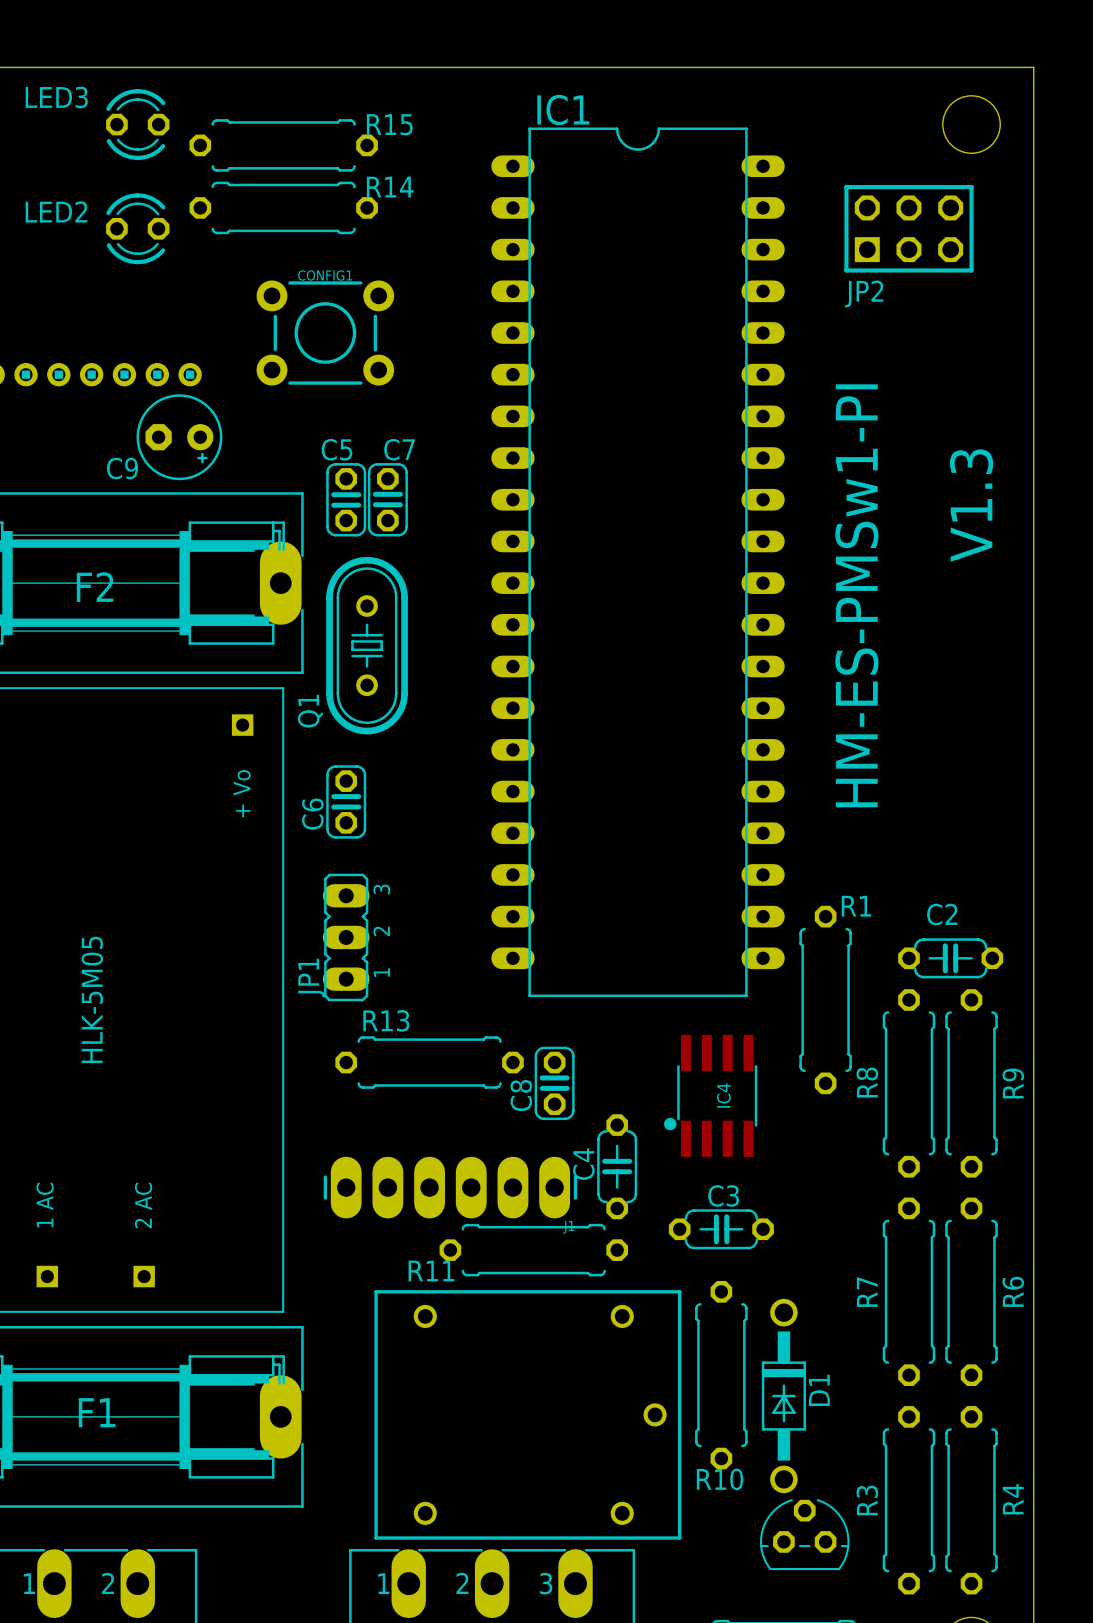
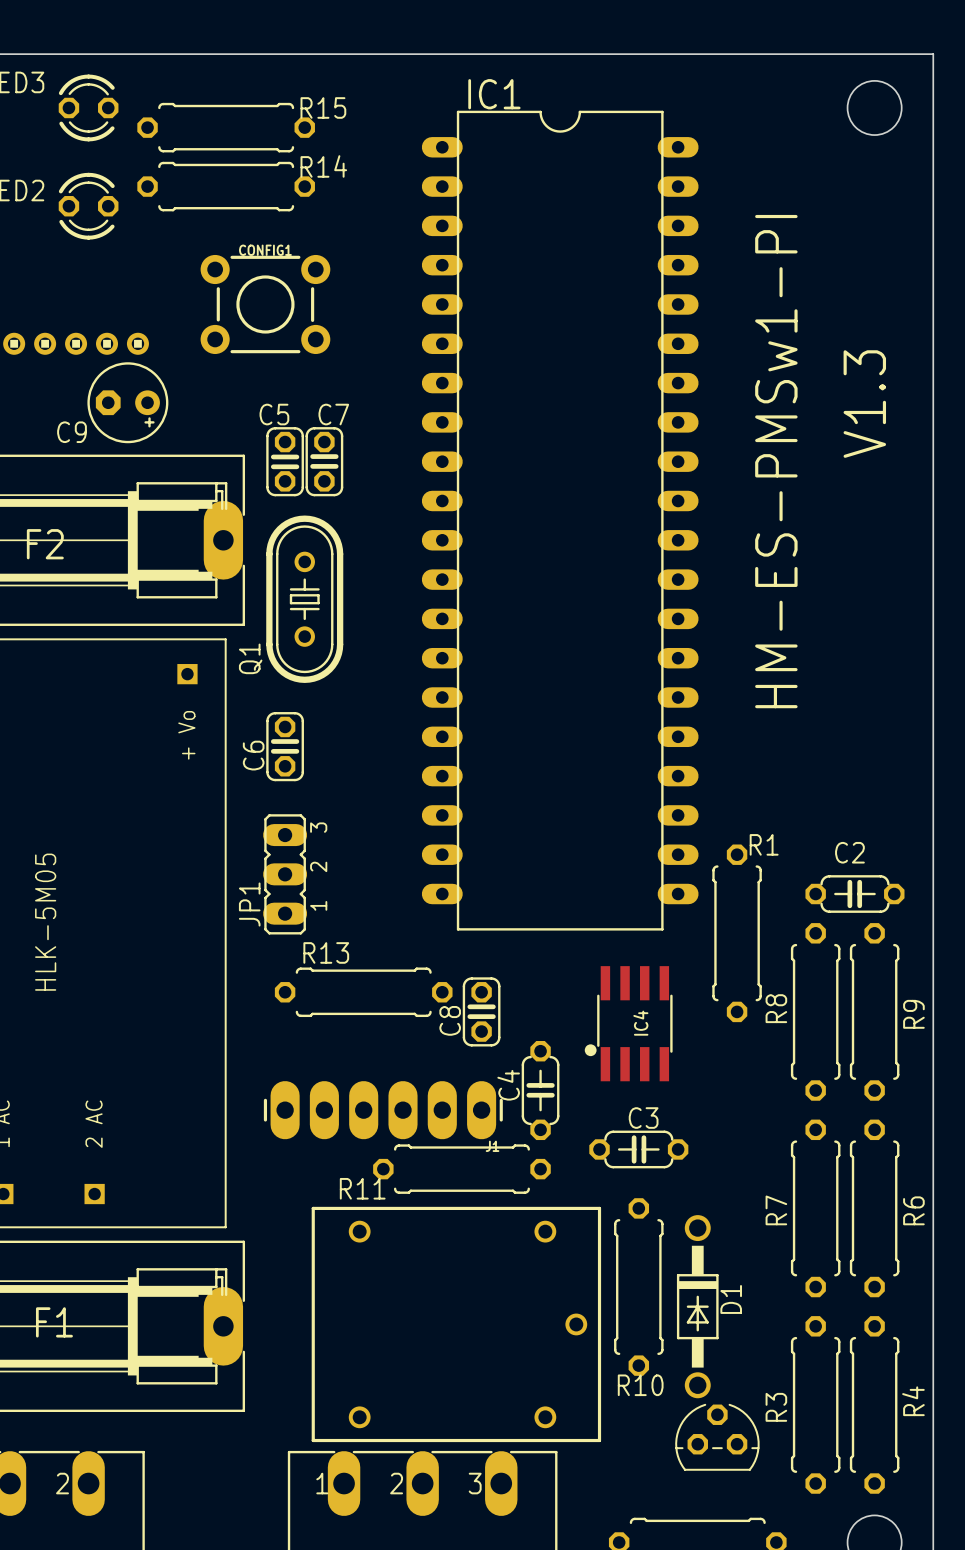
JP2: (908, 228) -> none
text position: V1.3 (971, 505) -> V1.3 (864, 404)
text position: HM-ES-PMSw1-PI (856, 595) -> HM-ES-PMSw1-PI (776, 461)

